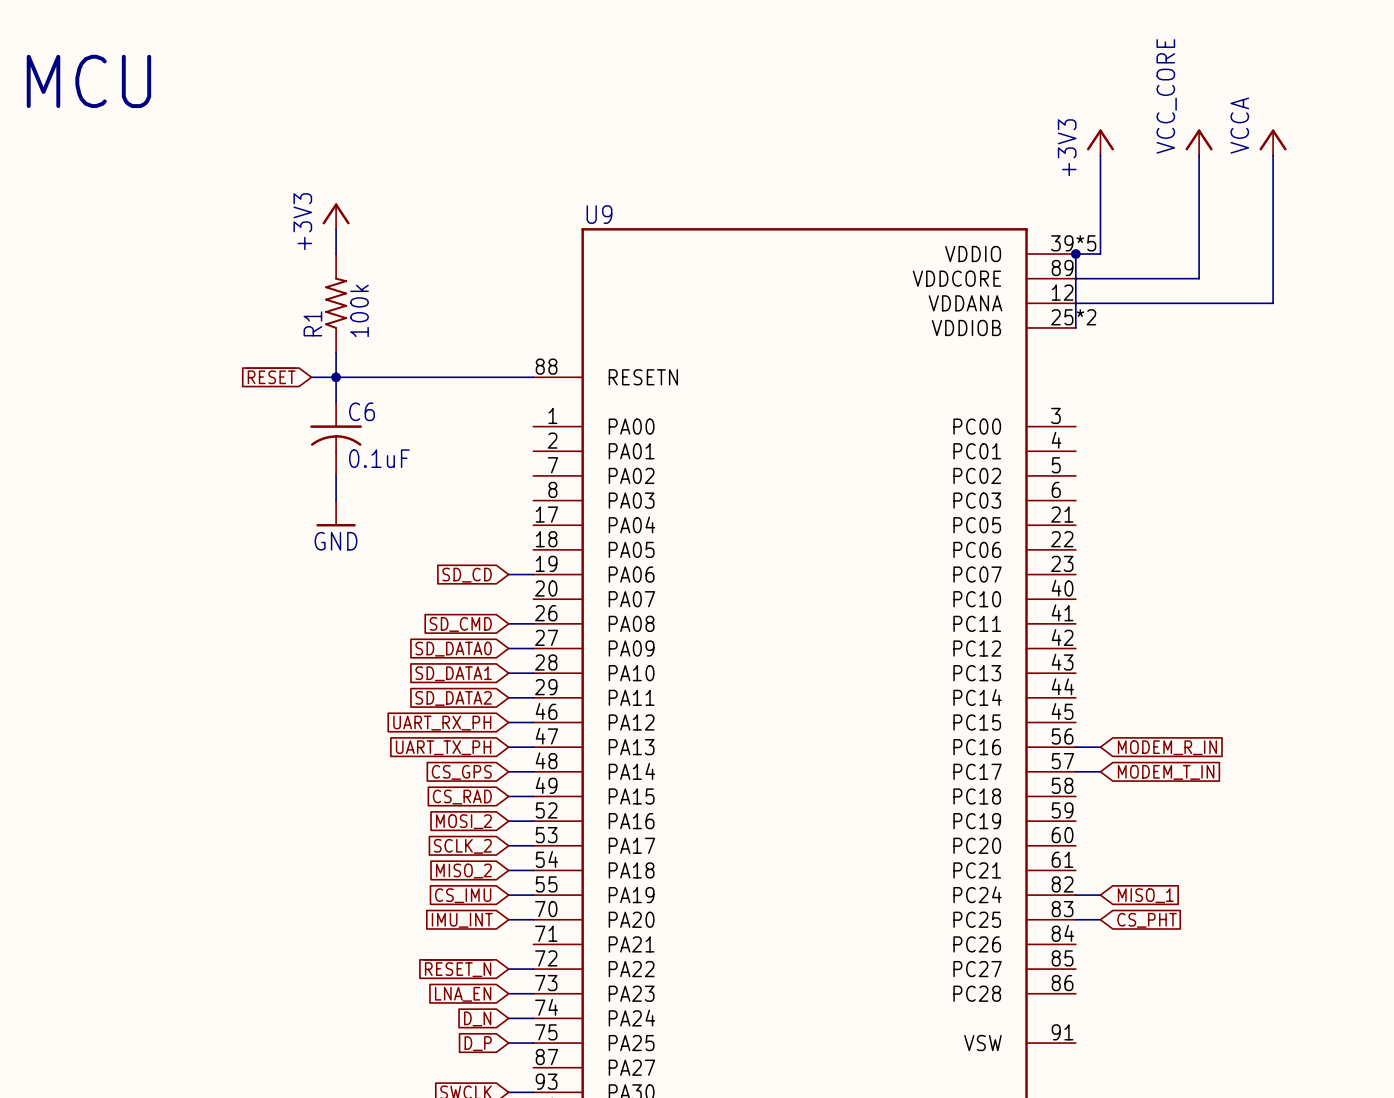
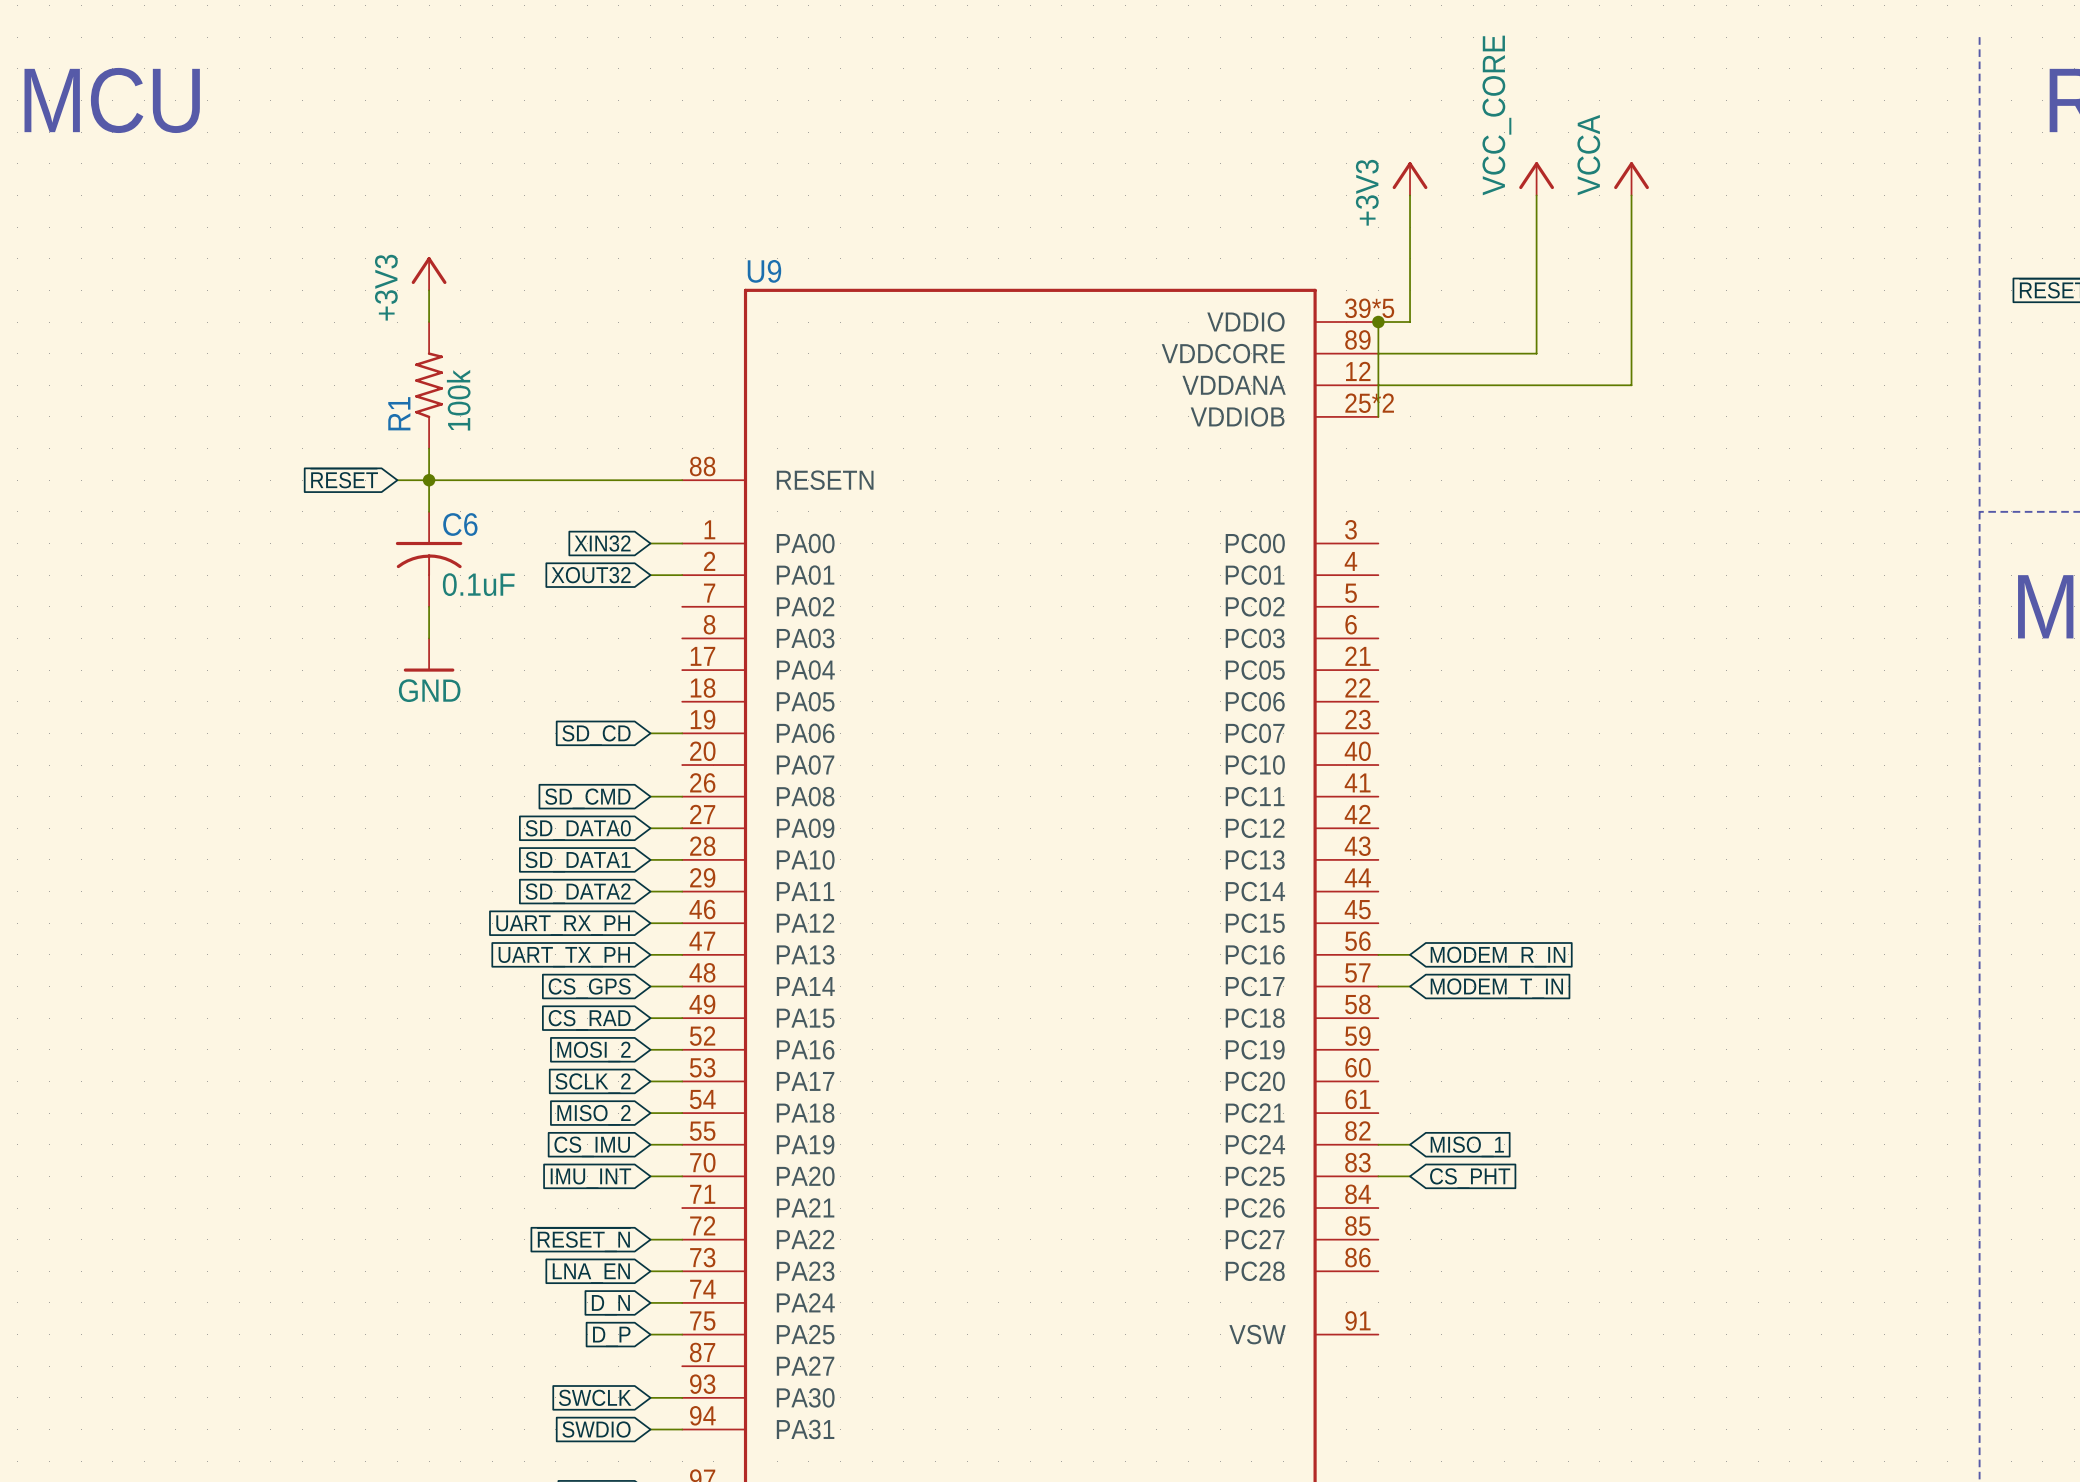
global label: none -> XIN32 (602, 543)
wire: none -> (650, 543) (682, 543)
global label: none -> XOUT32 (591, 575)
wire: none -> (650, 575) (682, 575)

